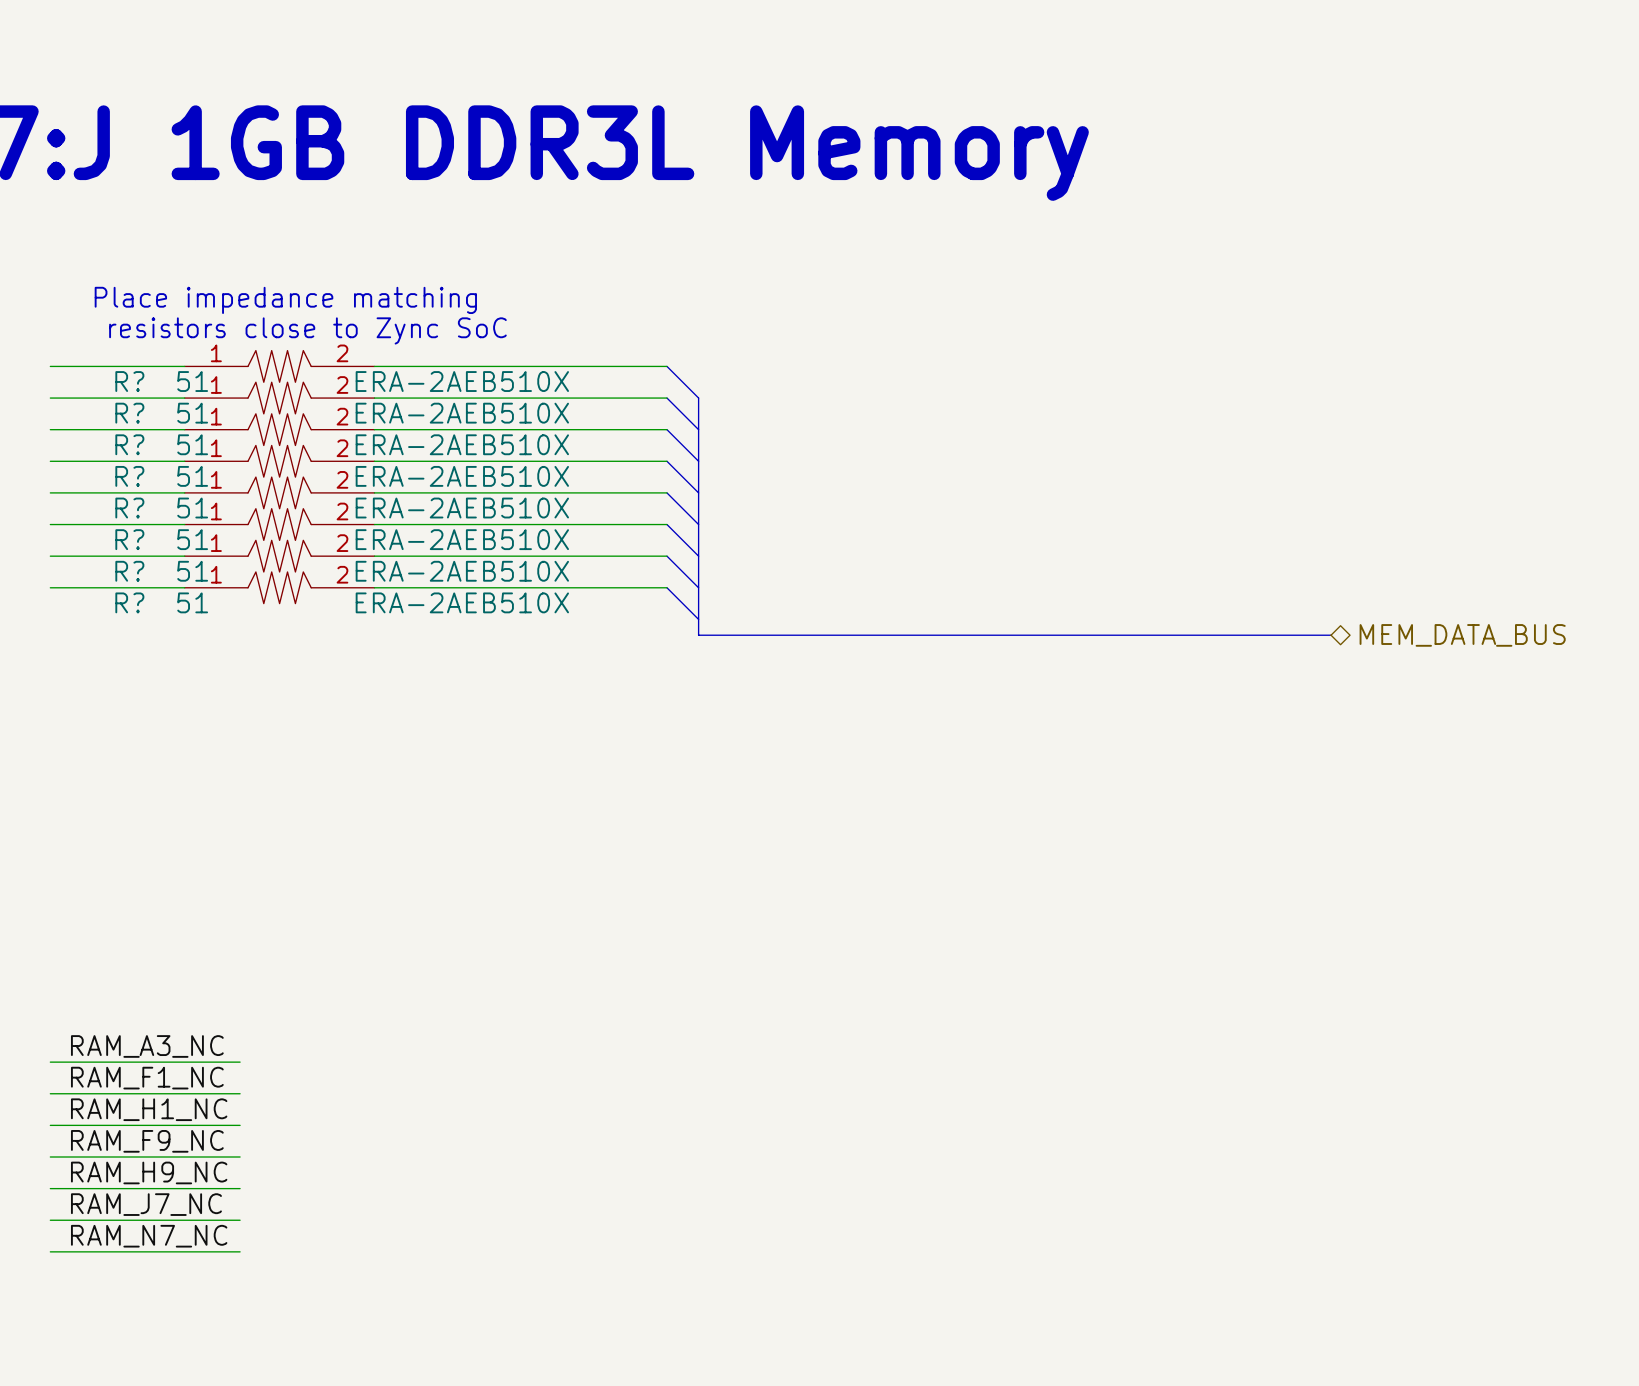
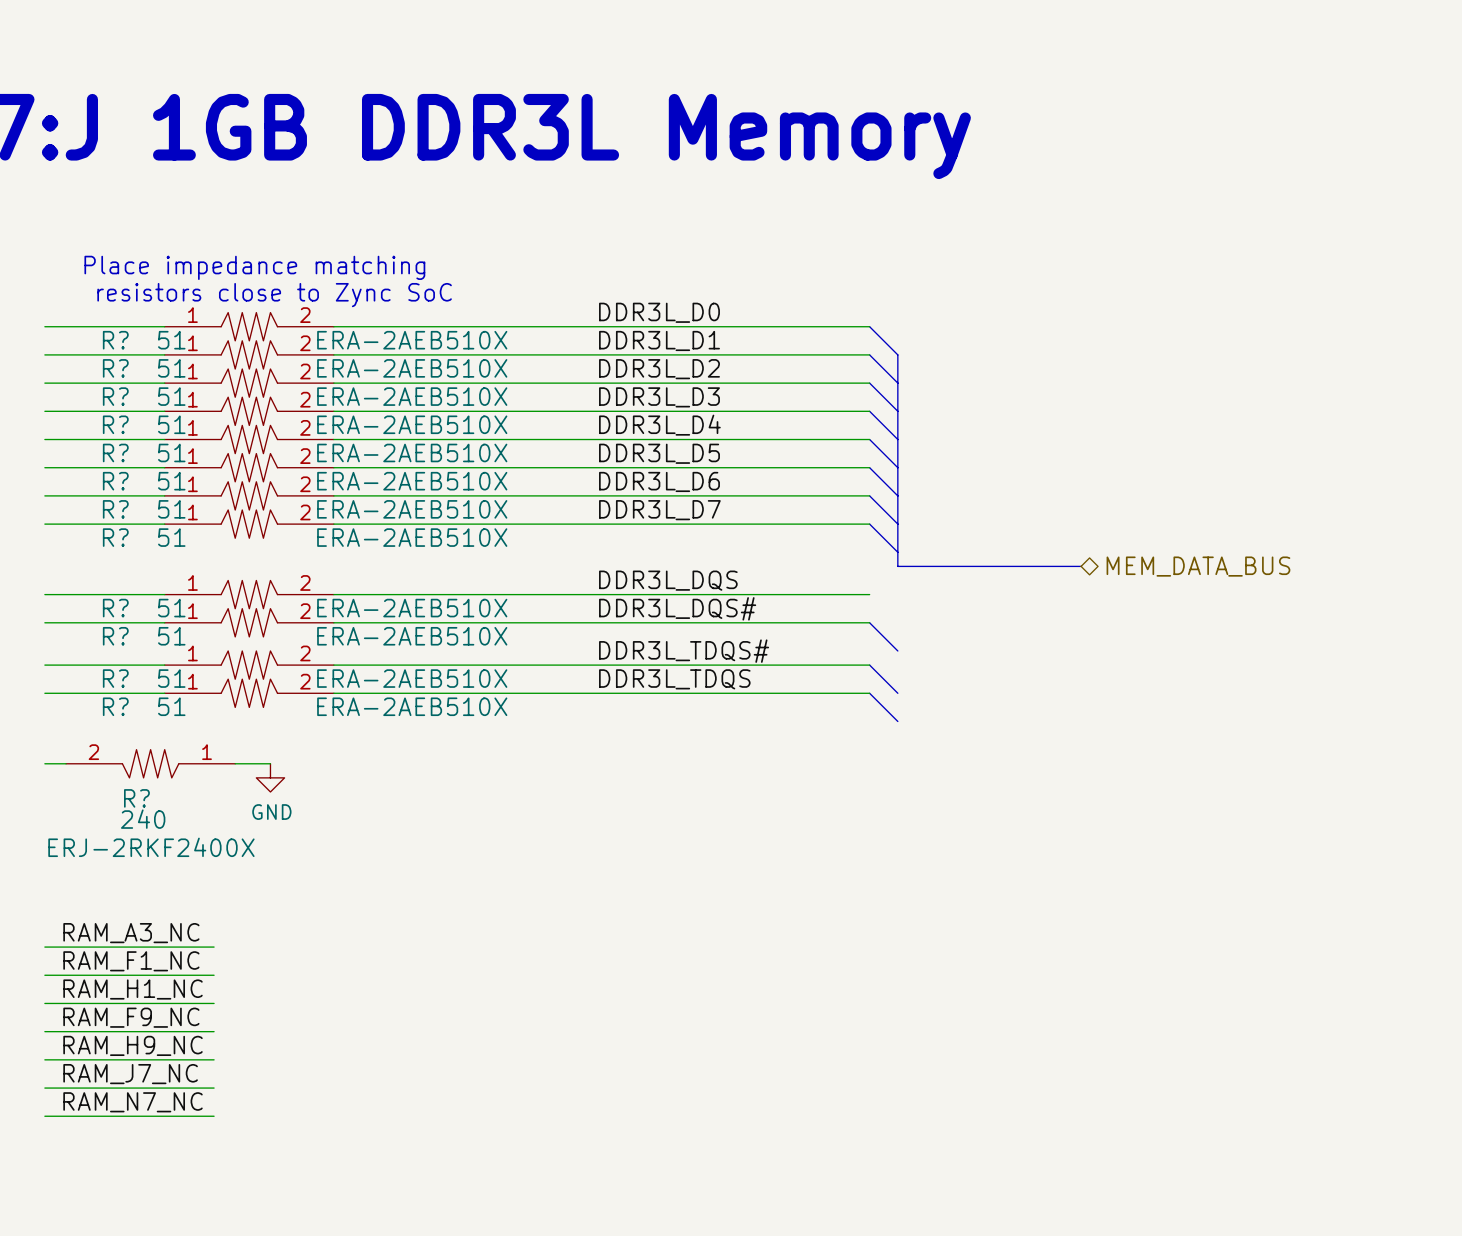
label: none -> DDR3L_D0 (659, 312)
wire: none -> (594, 326) (869, 326)
bus: (666, 366) (698, 398) (698, 635) (1006, 635) -> (869, 326) (897, 354) (897, 566)
label: none -> DDR3L_D1 (659, 340)
wire: none -> (594, 354) (869, 354)
bus: (666, 398) (698, 429) -> (869, 354) (897, 383)
label: none -> DDR3L_D2 (659, 369)
wire: none -> (594, 383) (869, 383)
bus: (666, 429) (698, 461) -> (869, 383) (897, 411)
label: none -> DDR3L_D3 (659, 397)
wire: none -> (594, 411) (869, 411)
bus: (666, 461) (698, 492) -> (869, 411) (897, 439)
label: none -> DDR3L_D4 (659, 425)
wire: none -> (594, 439) (869, 439)
bus: (666, 492) (698, 524) -> (869, 439) (897, 467)
label: none -> DDR3L_D5 (659, 453)
wire: none -> (594, 467) (869, 467)
bus: (666, 524) (698, 556) -> (869, 467) (897, 495)
label: none -> DDR3L_D6 (659, 481)
wire: none -> (594, 495) (869, 495)
bus: (666, 556) (698, 587) -> (869, 495) (897, 524)
label: none -> DDR3L_D7 (659, 510)
wire: none -> (594, 524) (869, 524)
bus: (666, 587) (698, 619) -> (869, 524) (897, 552)
bus: (1212, 635) (1331, 635) -> none
hierarchical label position: MEM_DATA_BUS (1462, 635) -> MEM_DATA_BUS (1198, 566)
label: none -> DDR3L_DQS (668, 580)
wire: none -> (44, 594) (164, 594)
R?: none -> ERA-2AEB510X (249, 594)
wire: none -> (333, 594) (869, 594)
label: none -> DDR3L_DQS# (677, 608)
wire: none -> (44, 622) (164, 622)
R?: none -> ERA-2AEB510X (249, 622)
wire: none -> (333, 622) (869, 622)
bus: none -> (869, 622) (897, 650)
label: none -> DDR3L_TDQS# (684, 651)
wire: none -> (44, 665) (164, 665)
R?: none -> ERA-2AEB510X (249, 665)
wire: none -> (333, 665) (869, 665)
bus: none -> (869, 665) (897, 693)
label: none -> DDR3L_TDQS (674, 679)
wire: none -> (44, 693) (164, 693)
R?: none -> ERA-2AEB510X (249, 693)
wire: none -> (333, 693) (869, 693)
bus: none -> (869, 693) (897, 721)
wire: none -> (44, 763) (66, 763)
R?: none -> ERJ-2RKF2400X (150, 763)
wire: none -> (235, 763) (270, 763)
power symbol: none -> GND (270, 777)

